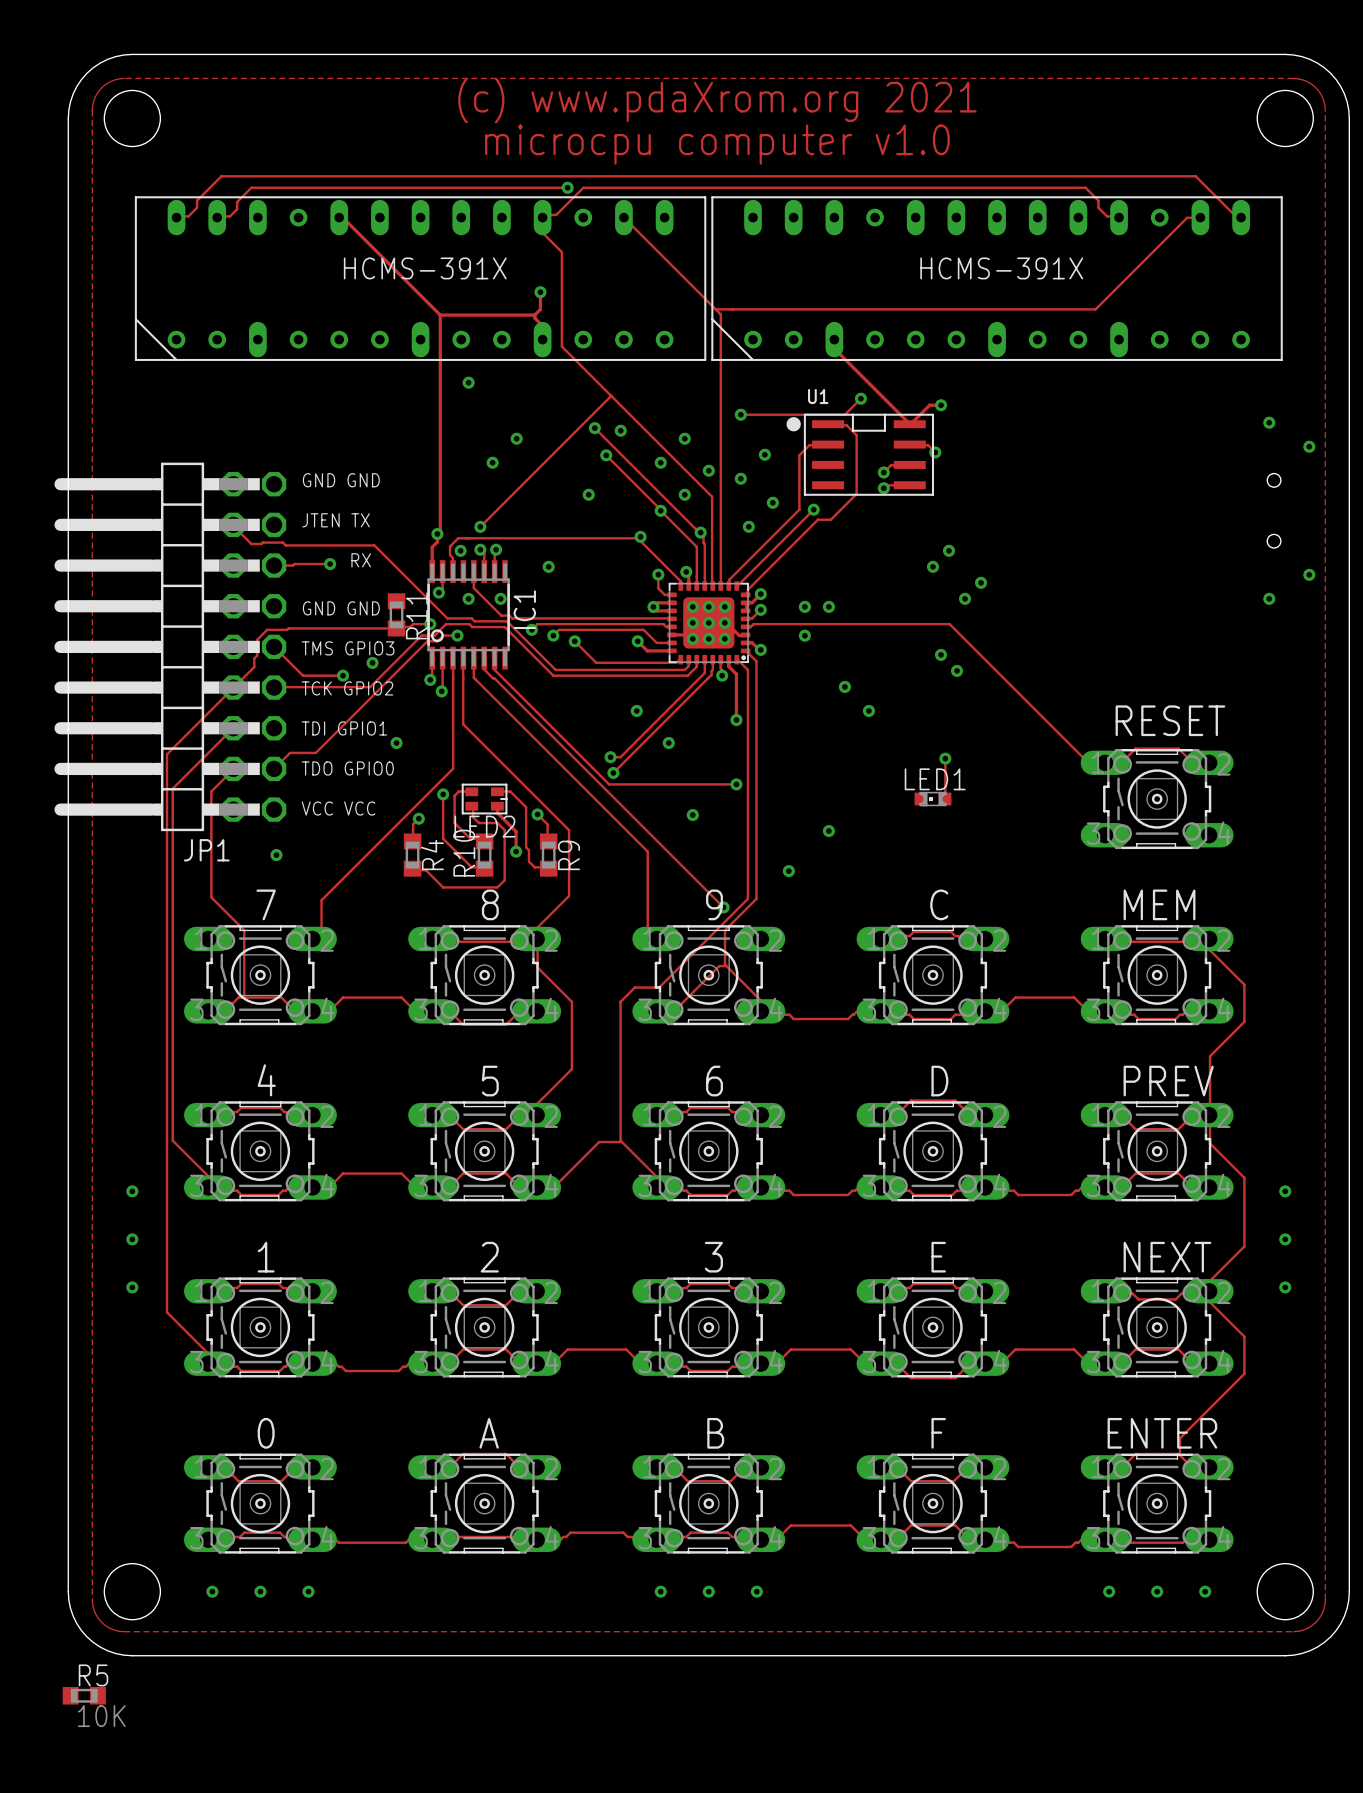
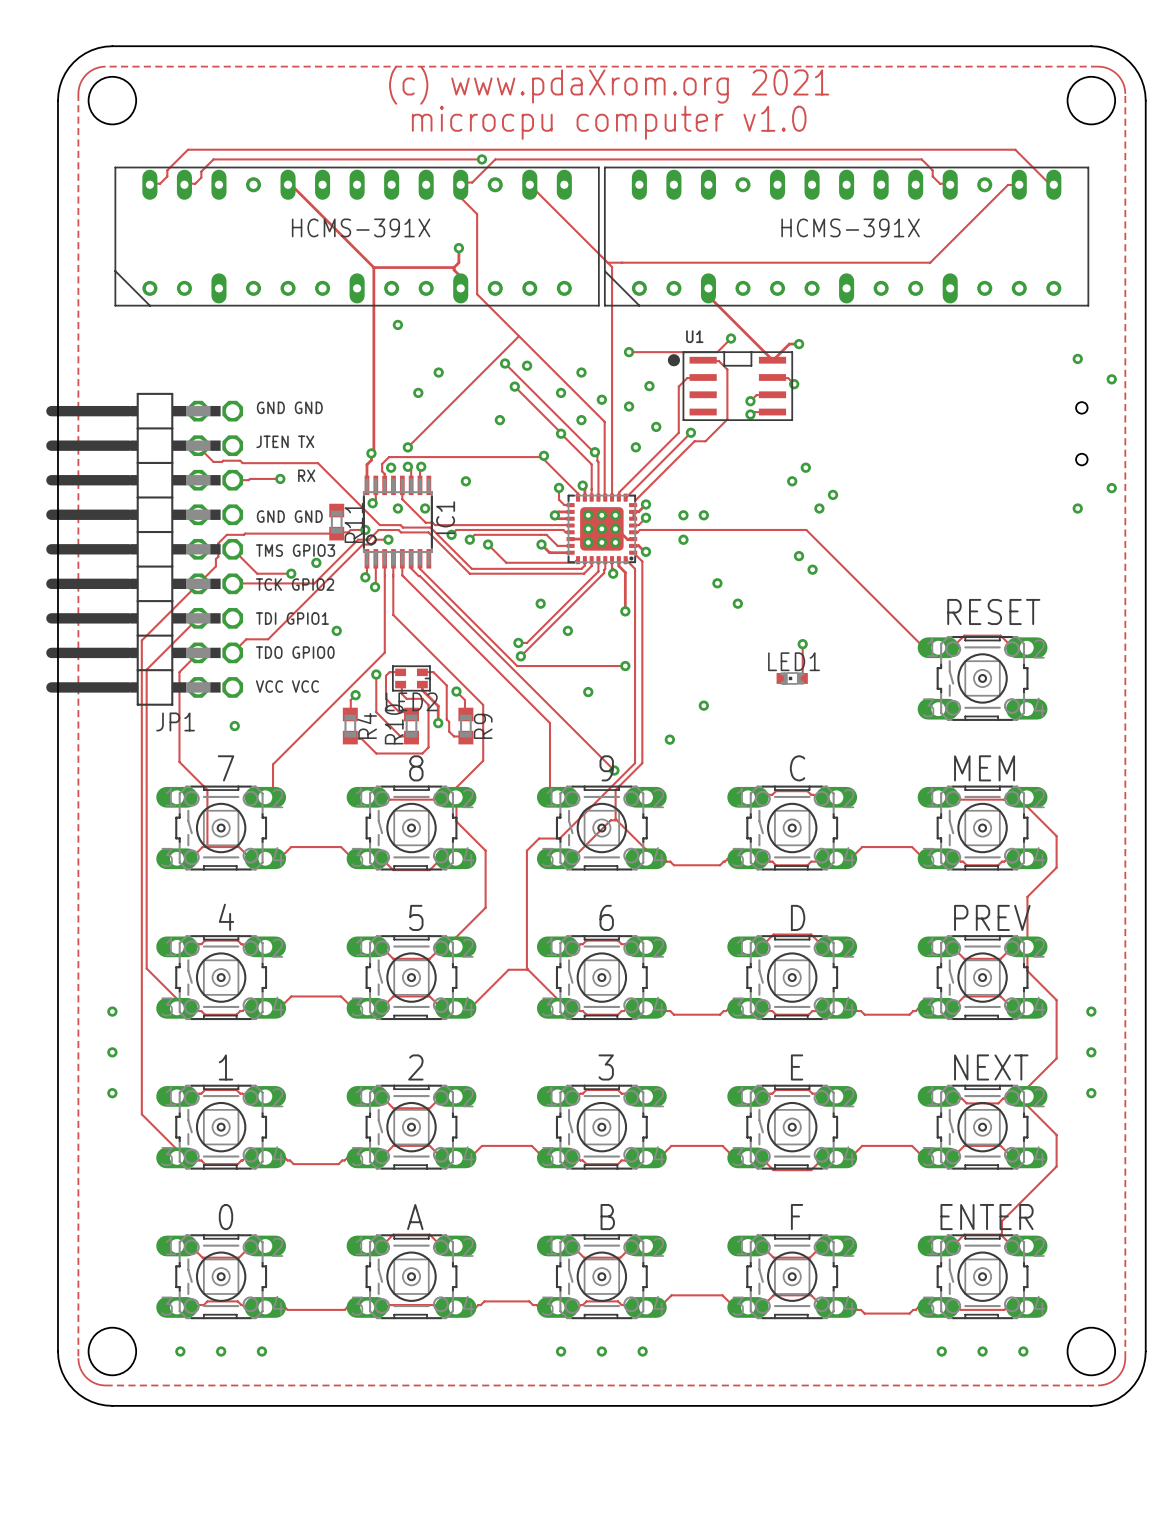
R5: 10K (84, 1695) -> none

